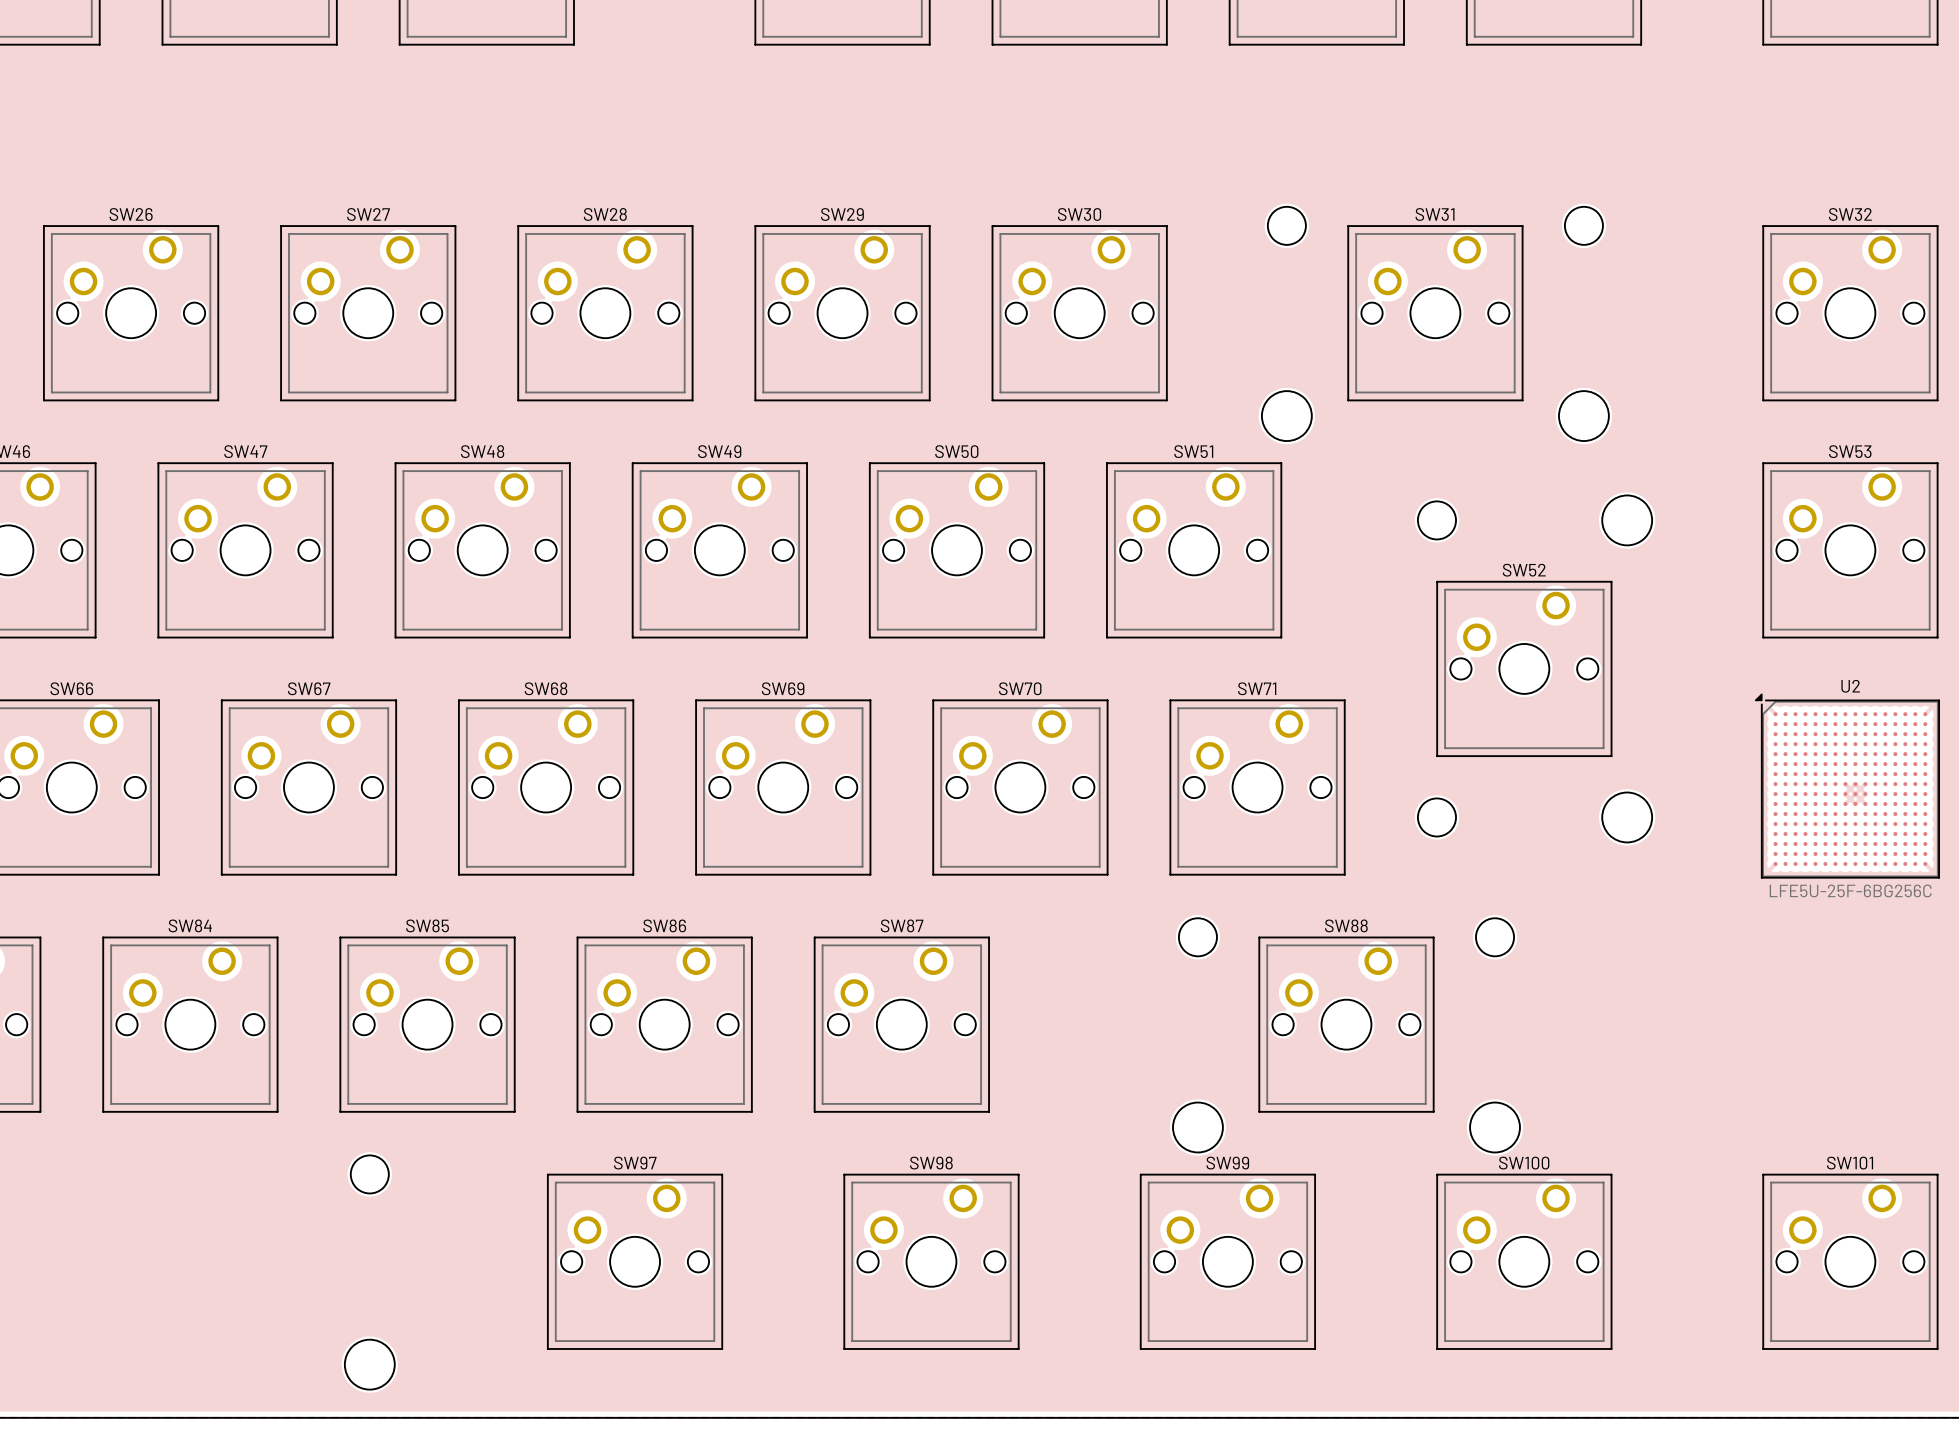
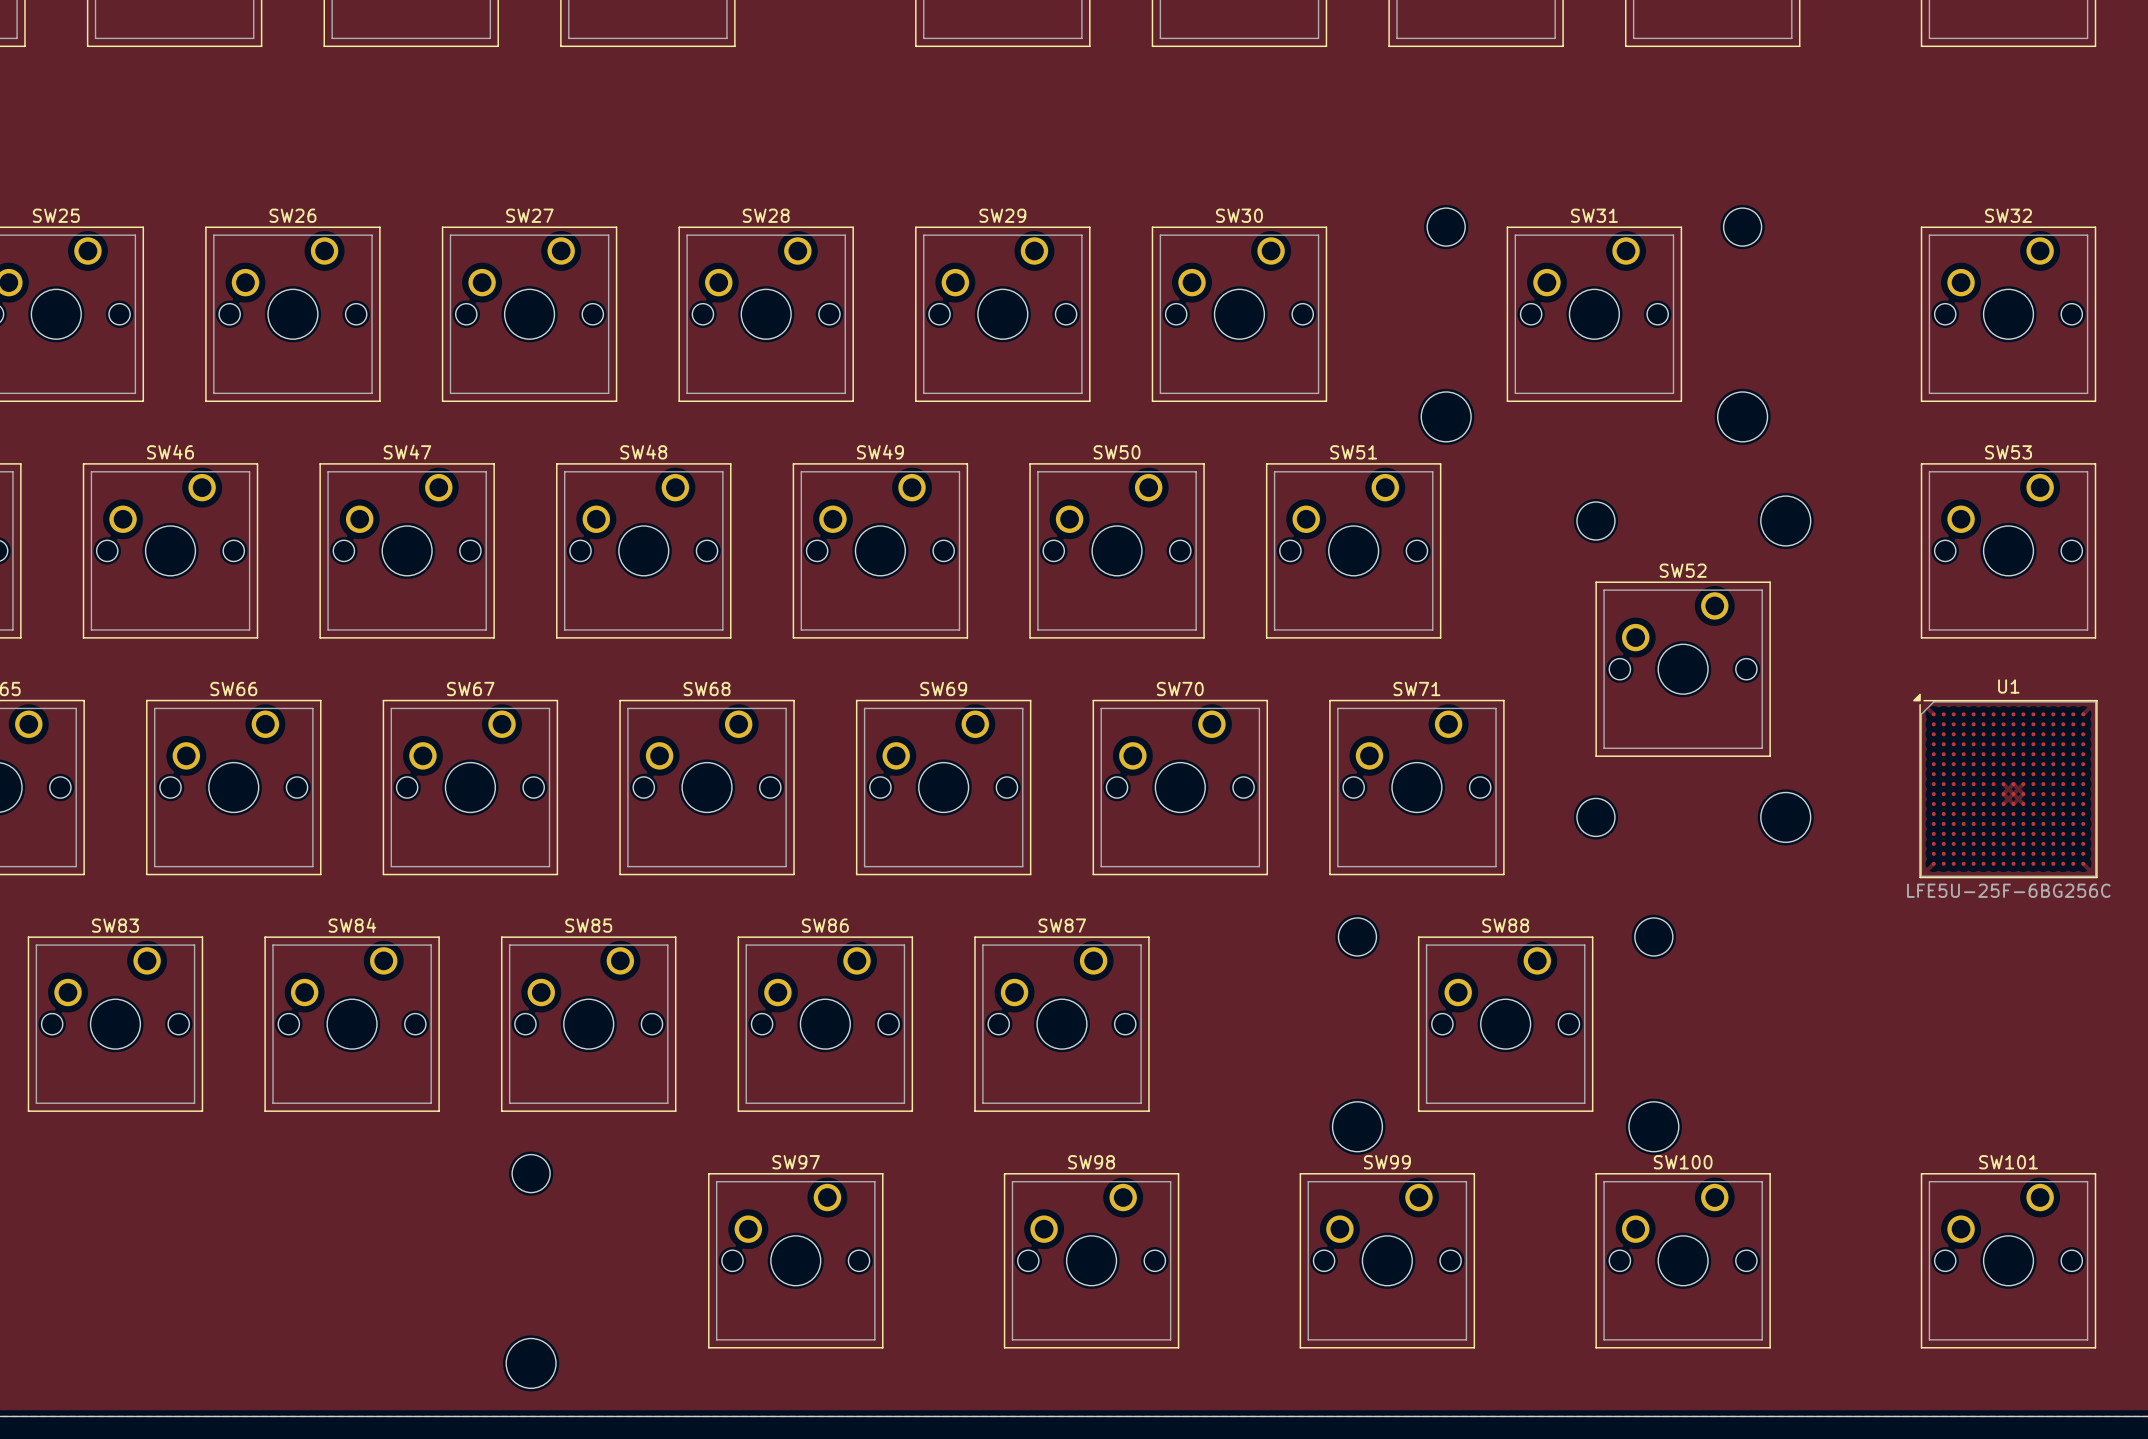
U2 name: U2 (1850, 686) -> U1 (2008, 686)

